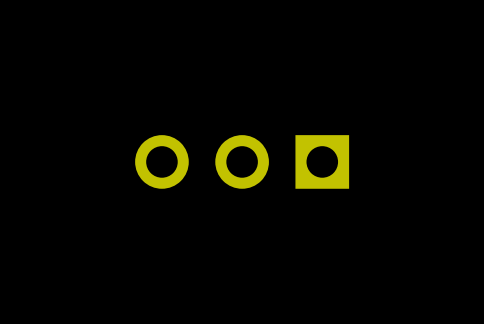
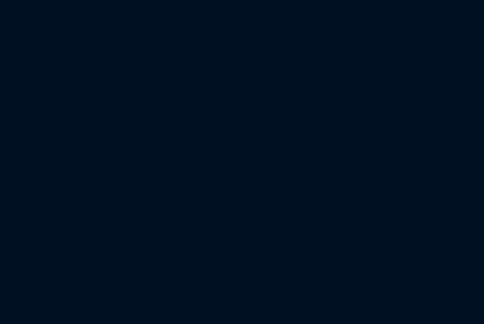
part: (242, 161) -> none

